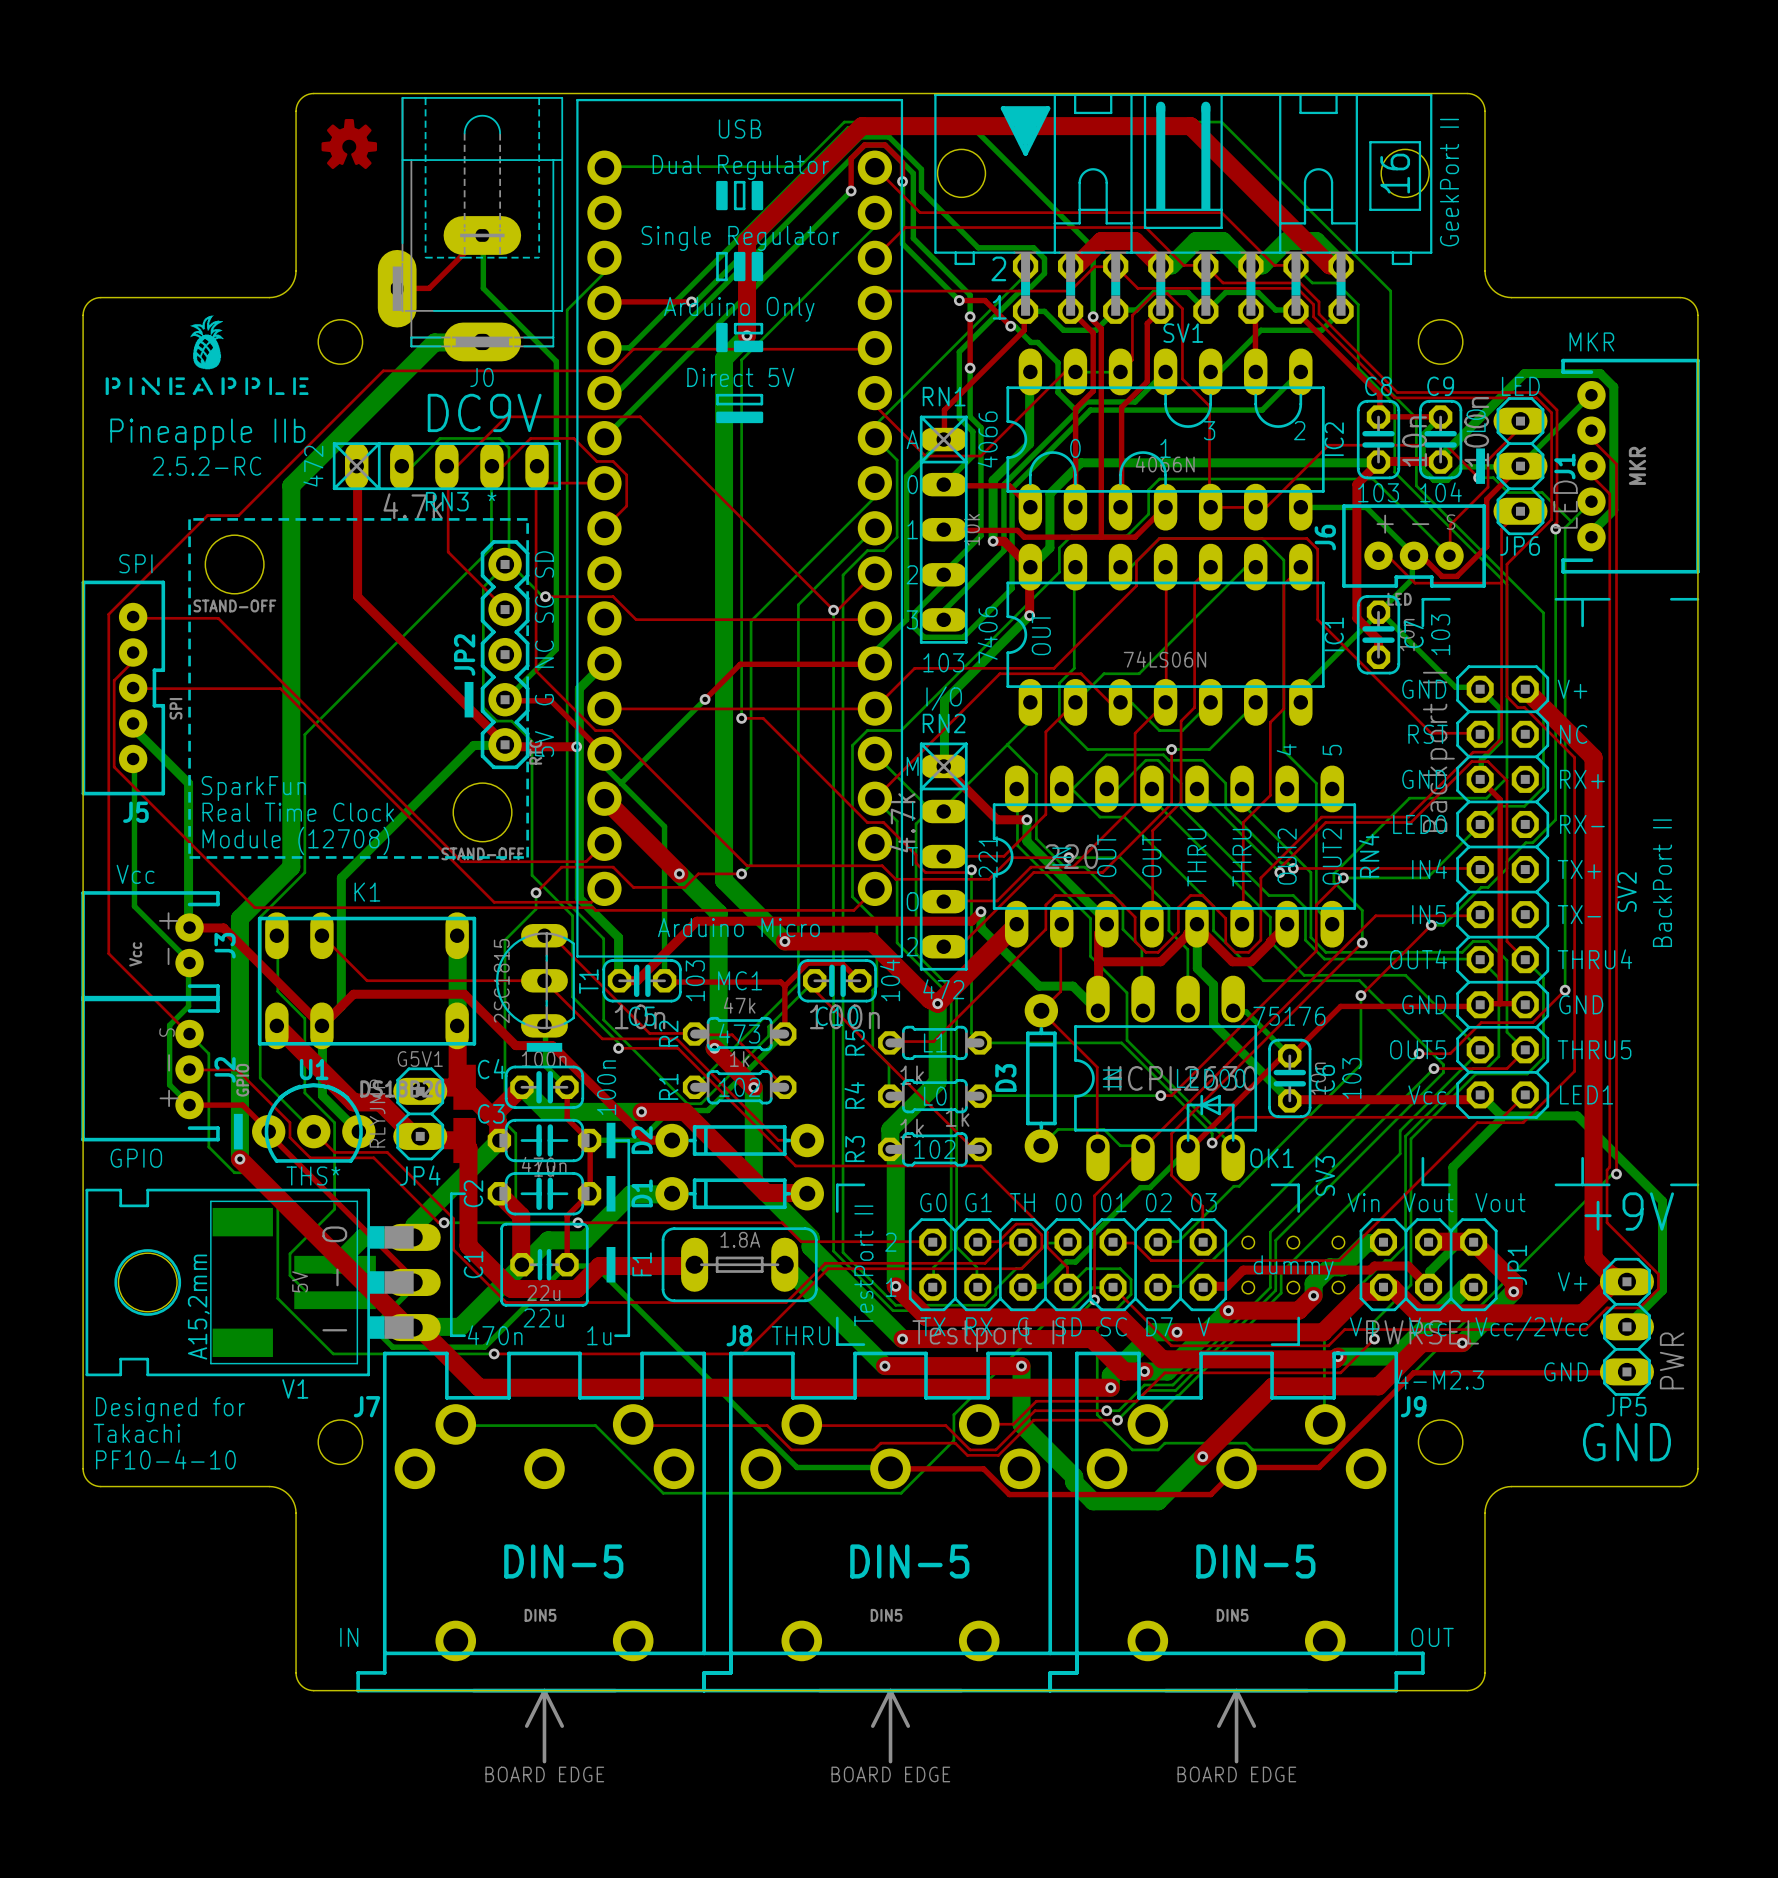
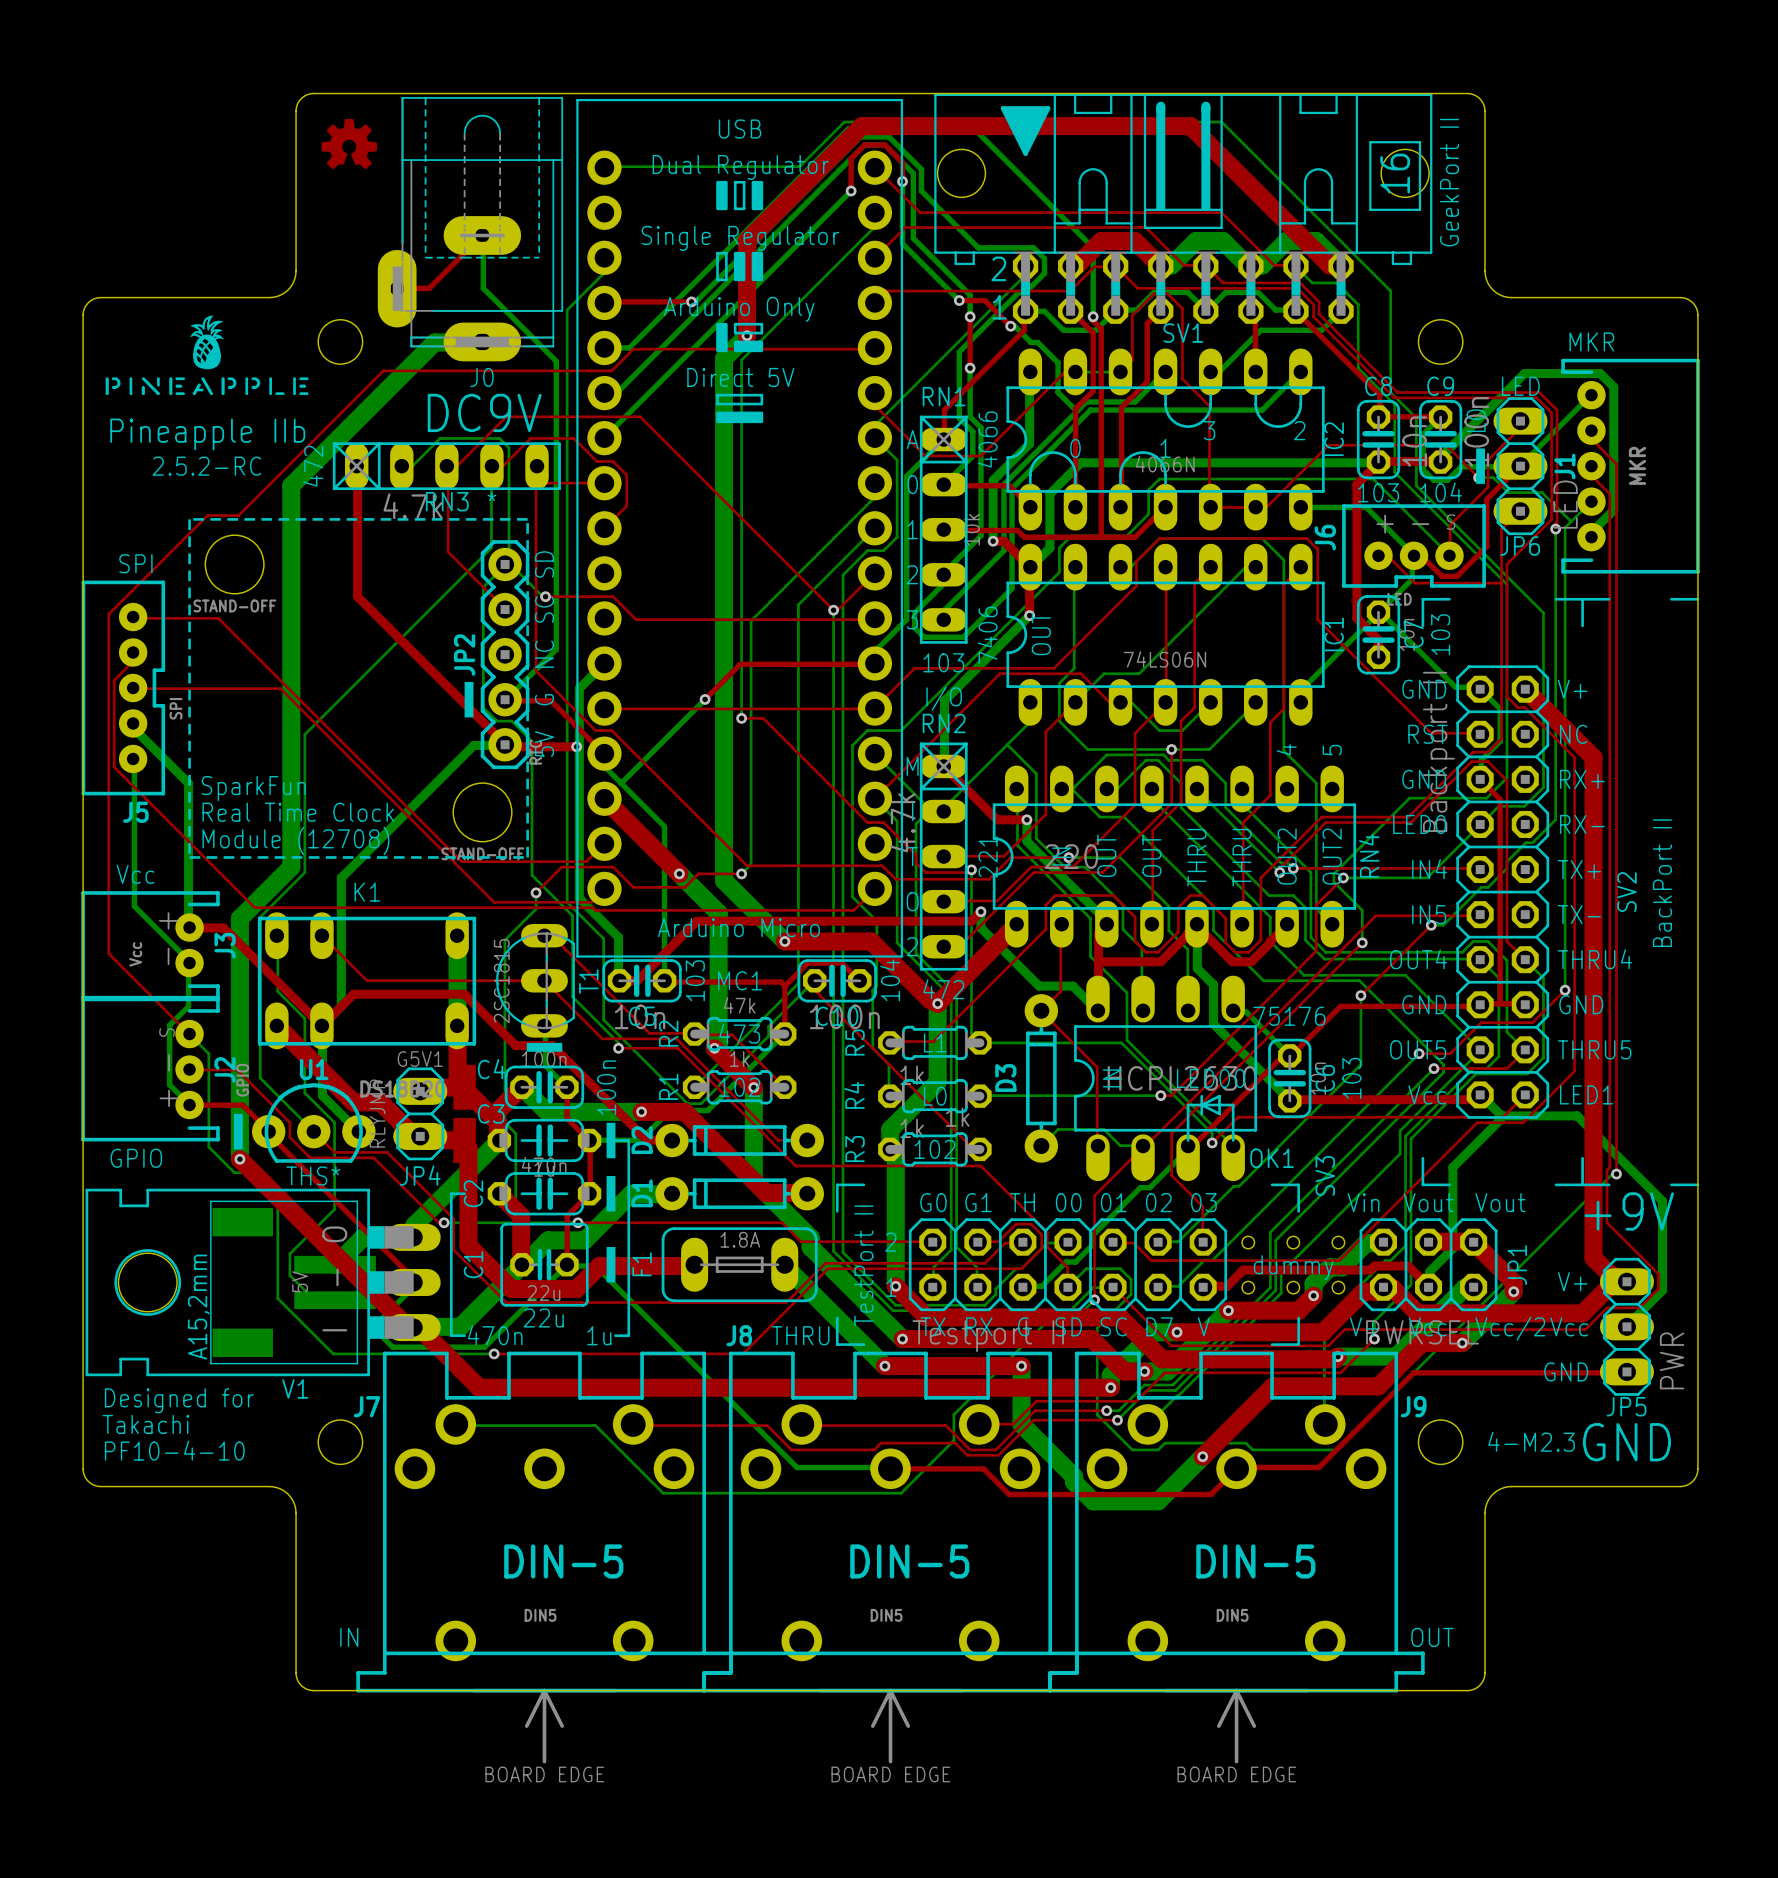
text position: 4-M2.3 (1440, 1379) -> 4-M2.3 (1531, 1441)
text position: Designed for (170, 1409) -> Designed for (179, 1400)
text position: Takachi (137, 1433) -> Takachi (145, 1424)
text position: PF10-4-10 (165, 1459) -> PF10-4-10 (174, 1450)

